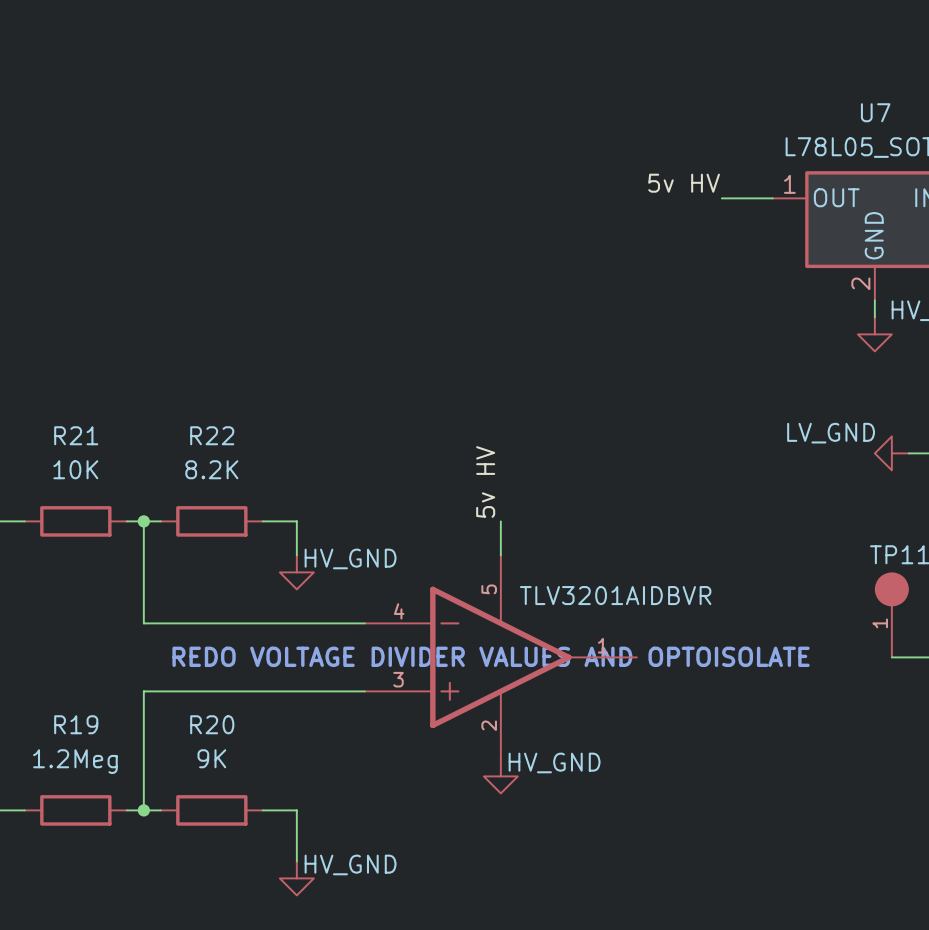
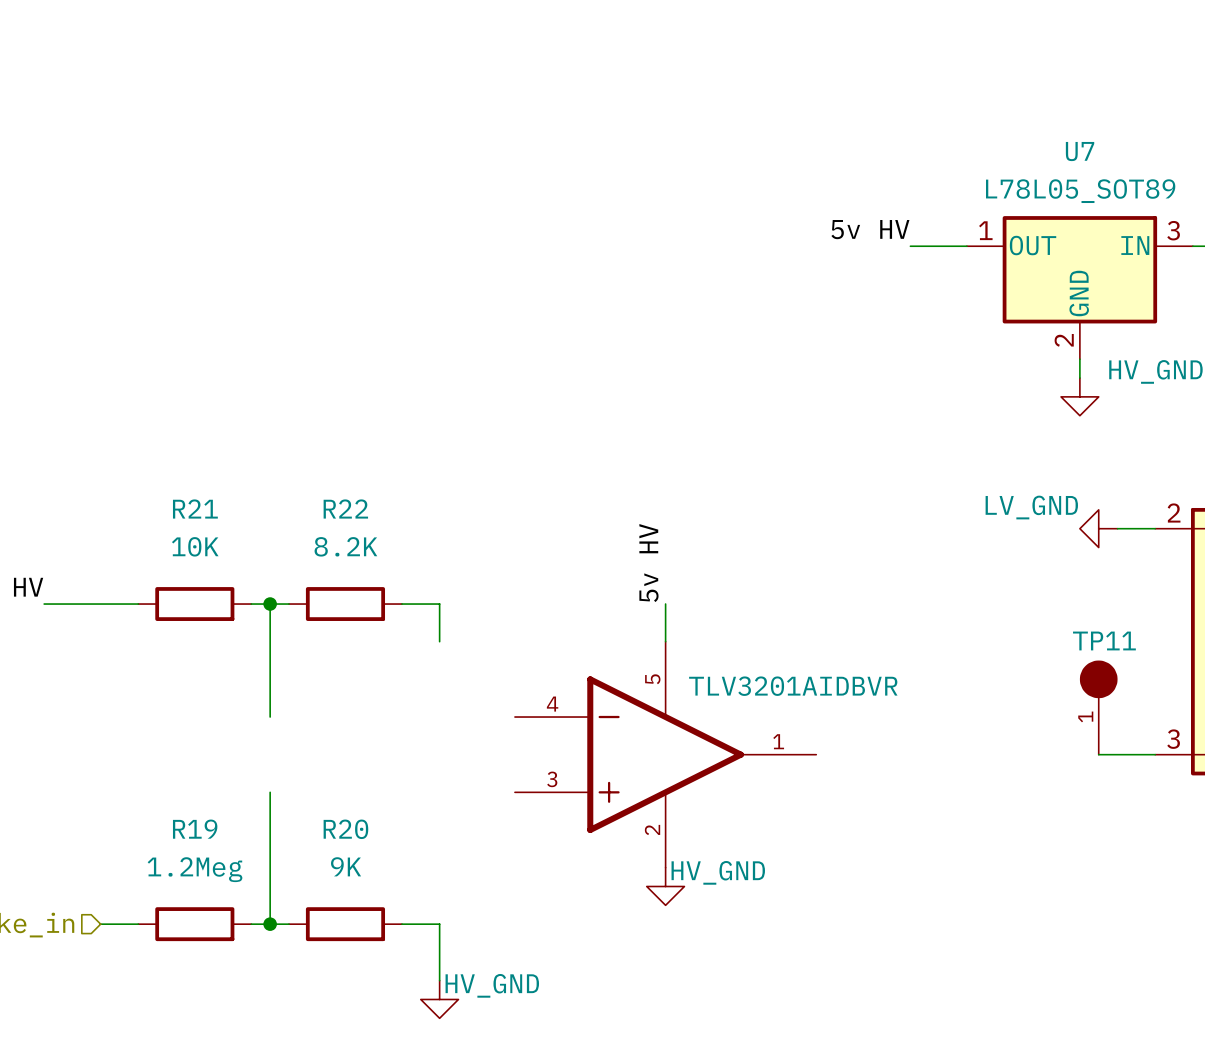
power symbol: HV_GND (296, 572) -> none
wire: (143, 623) (364, 623) -> none
text: REDO VOLTAGE DIVIDER VALUES AND OPTOISOLATE (491, 656) -> none
wire: (143, 691) (364, 691) -> none

